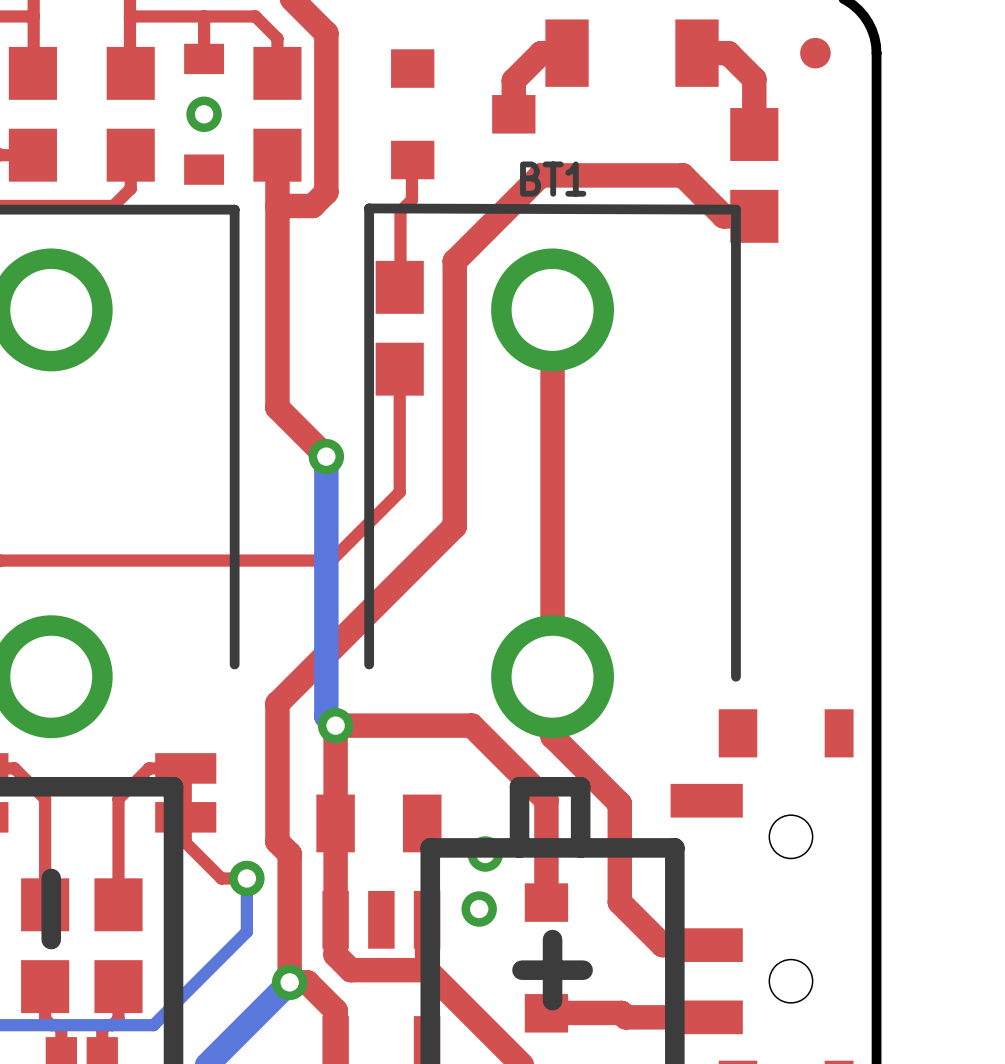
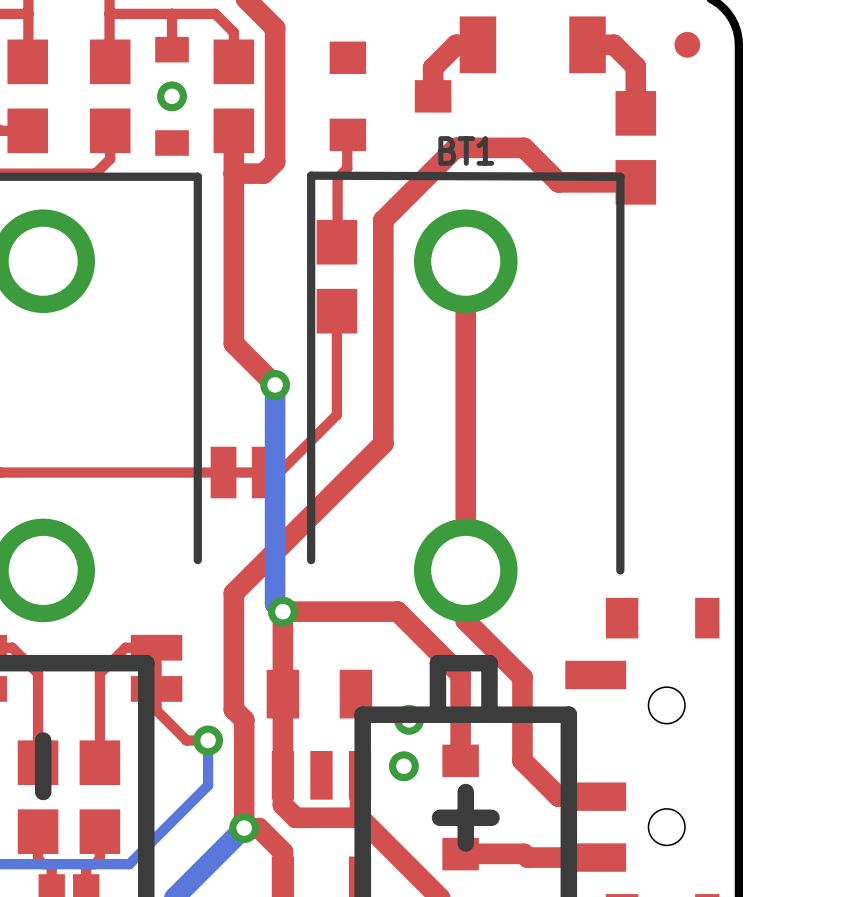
top track: (621, 175) (682, 175) (723, 216) -> (524, 147) (558, 182) (610, 182)
part: none -> (244, 472)
top track: (314, 560) (265, 560) -> none

